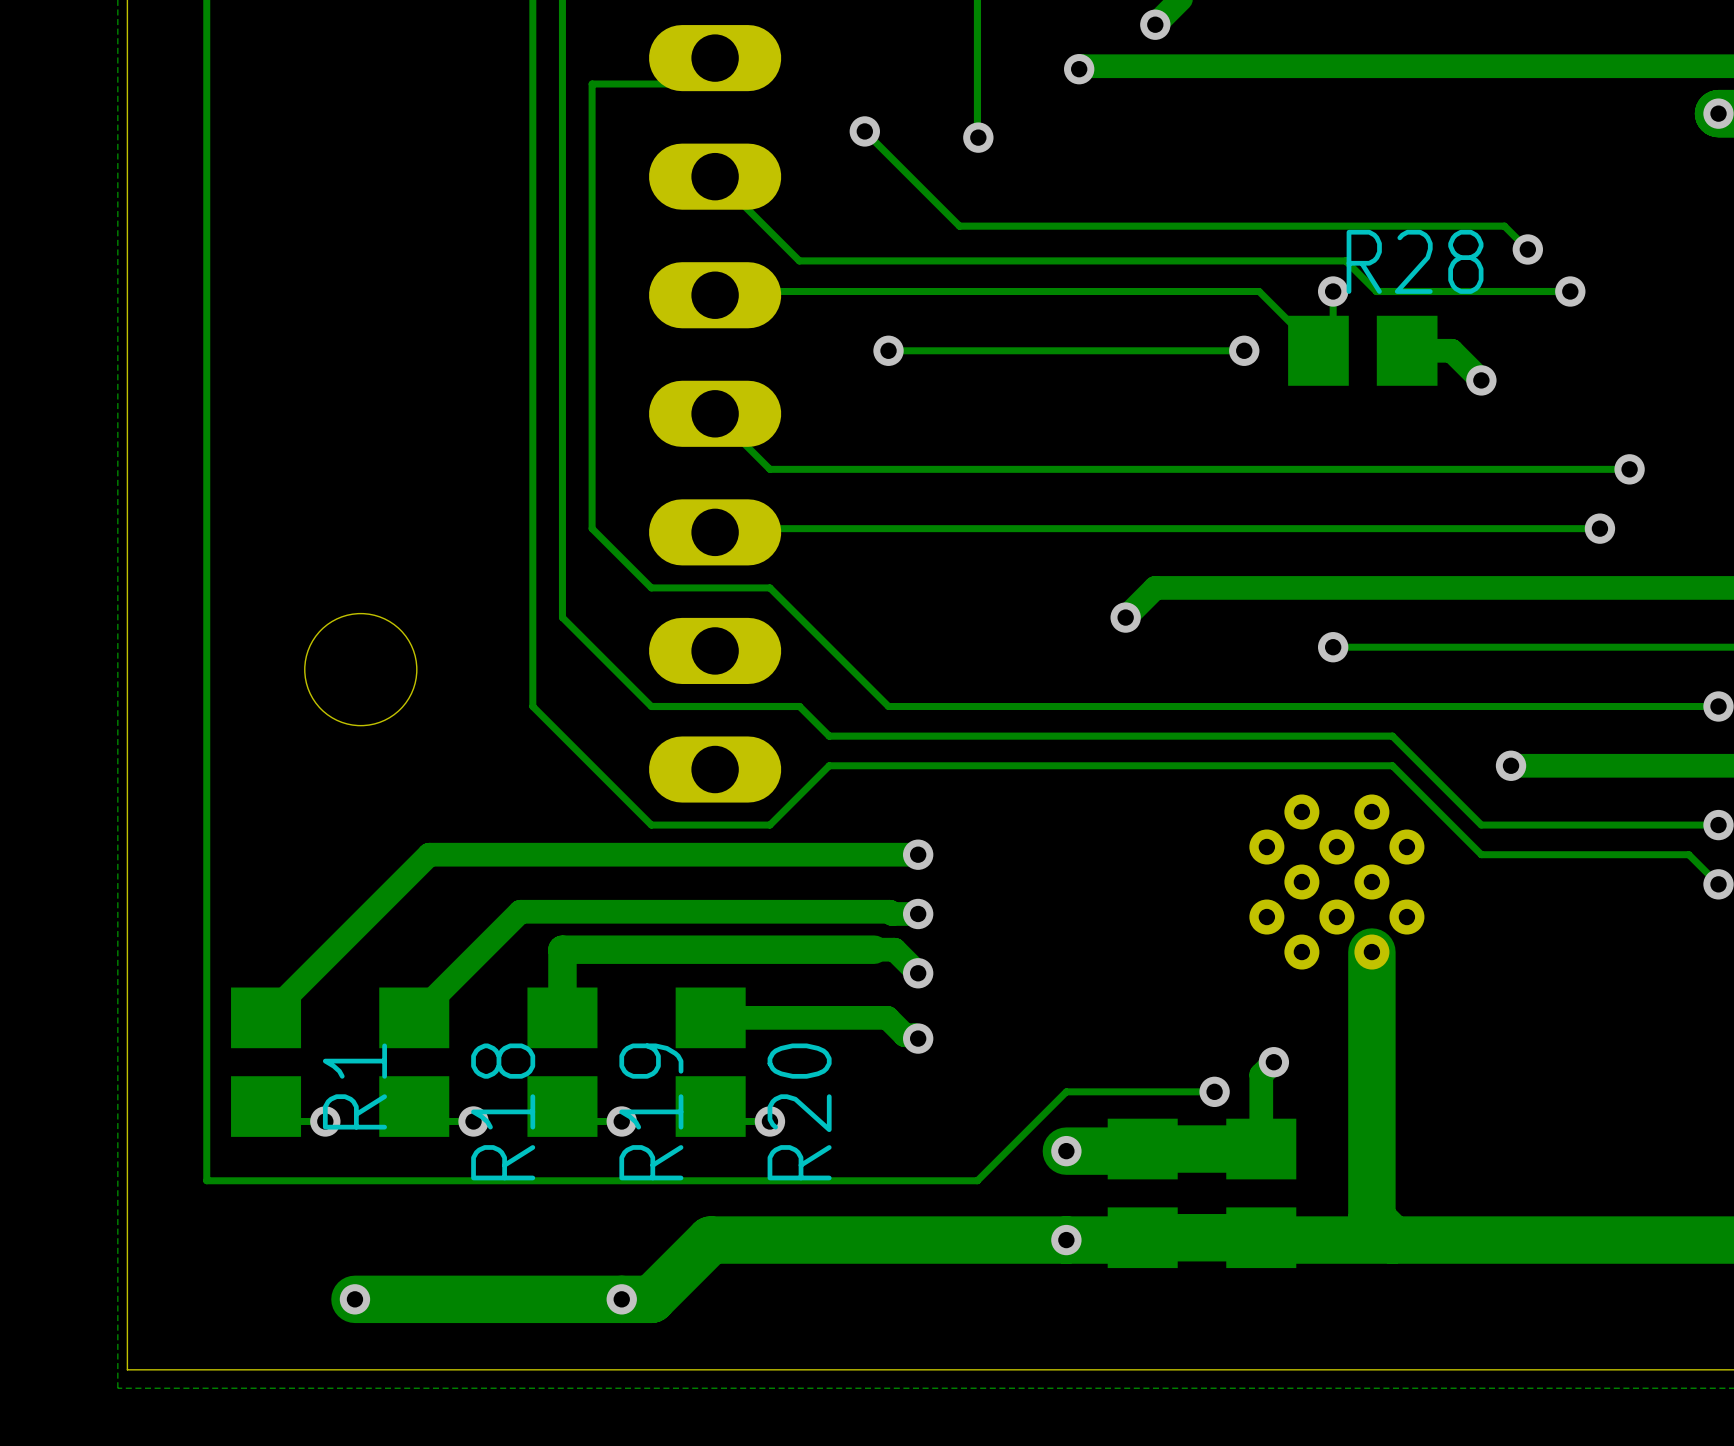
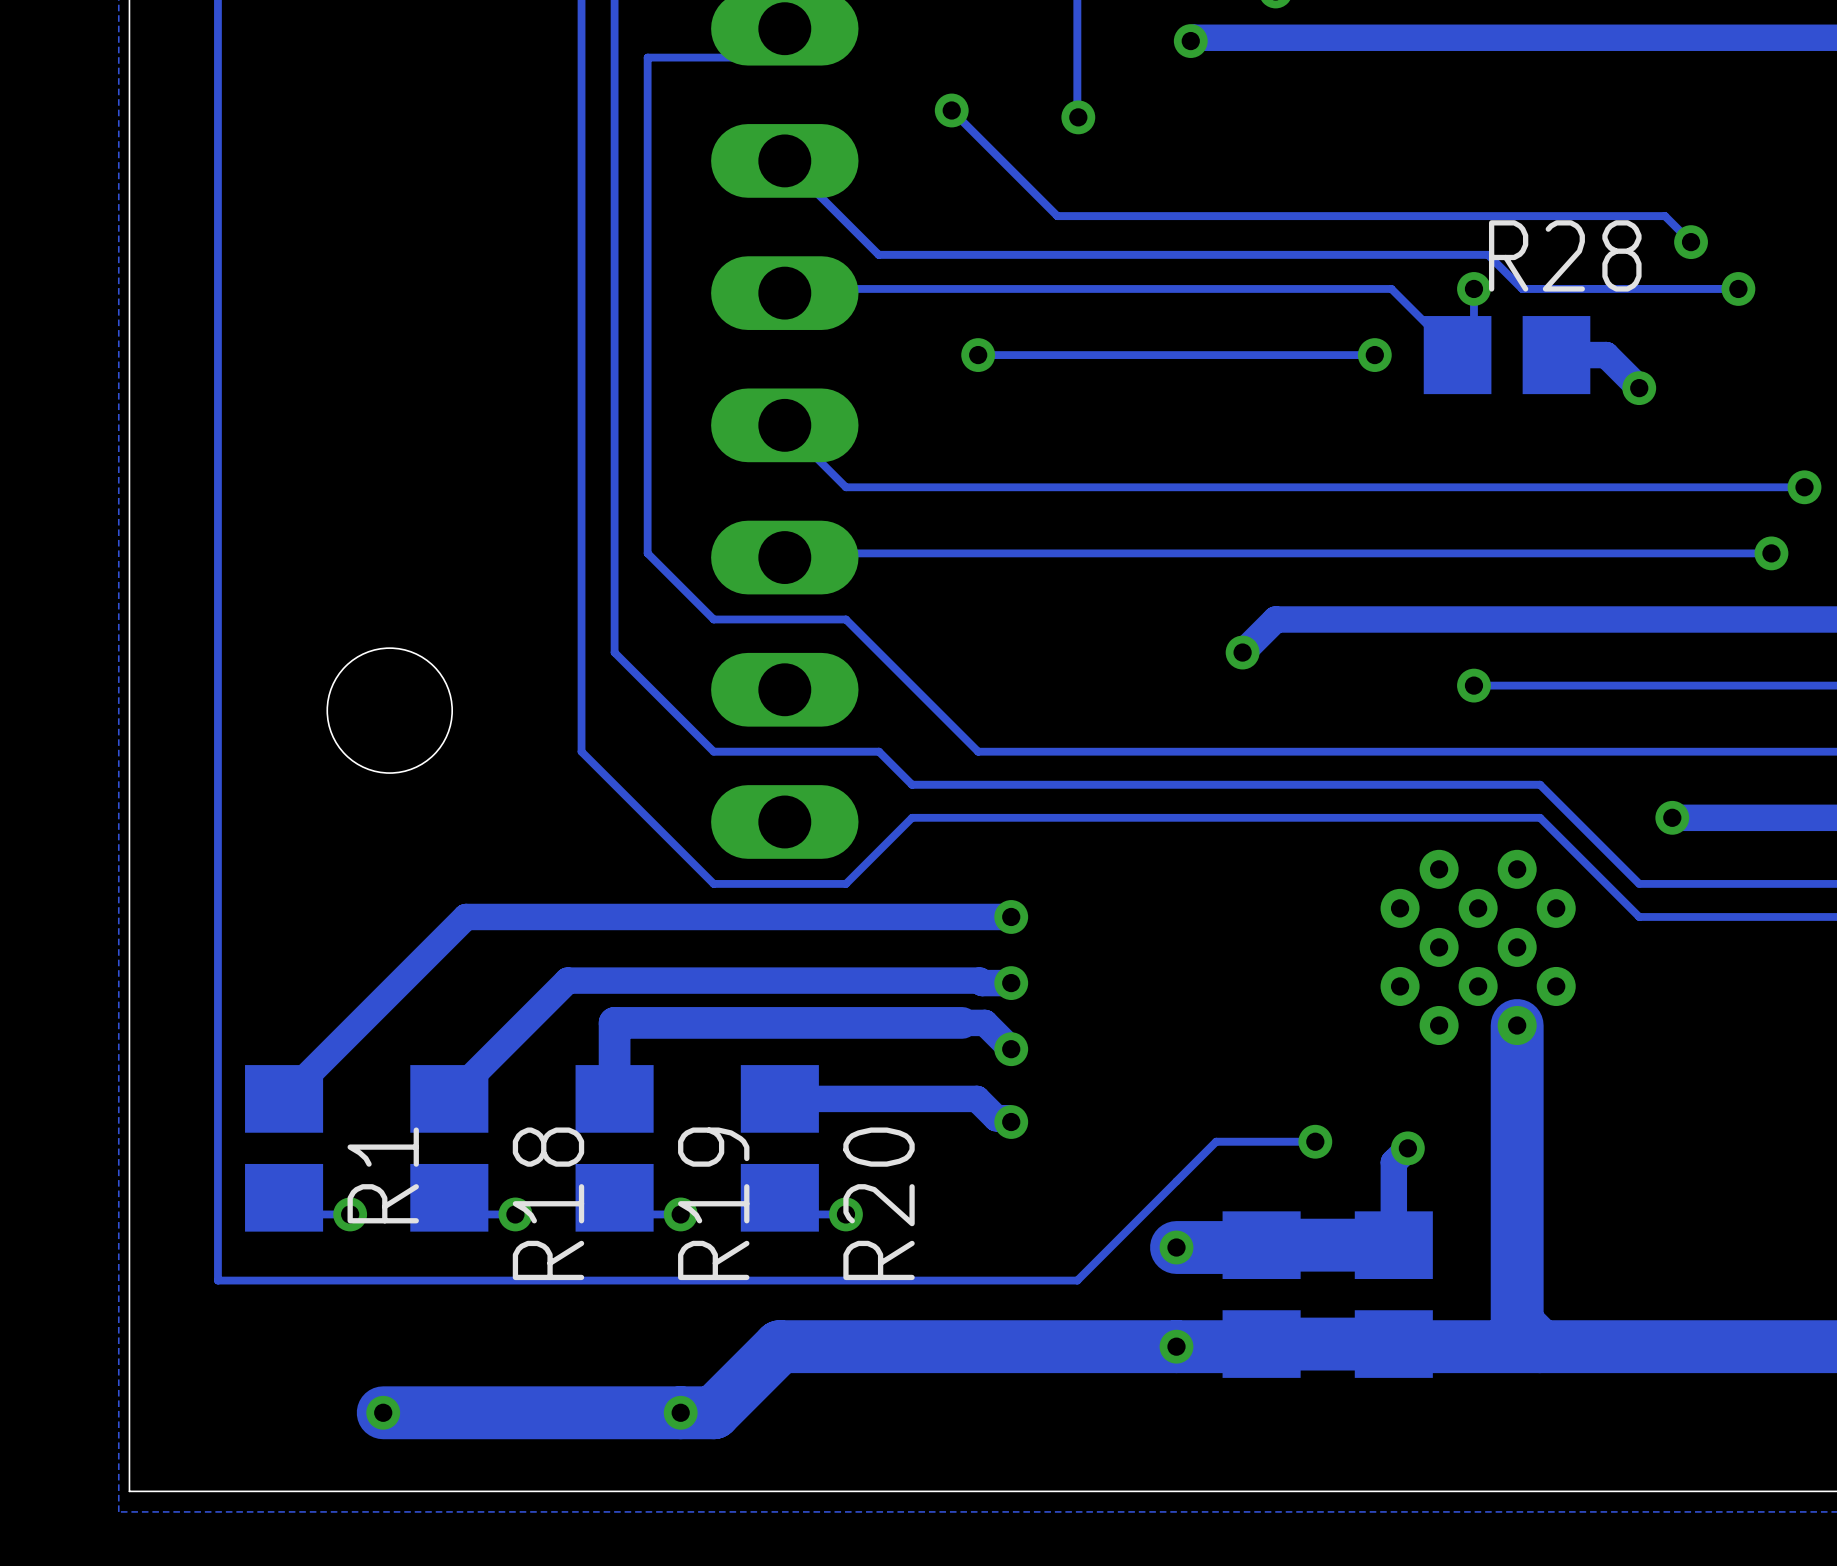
track: (1214, 1091) (1066, 1091) -> (1315, 1141) (1216, 1141) (1176, 1181)
via position: (1214, 1091) -> (1315, 1141)

